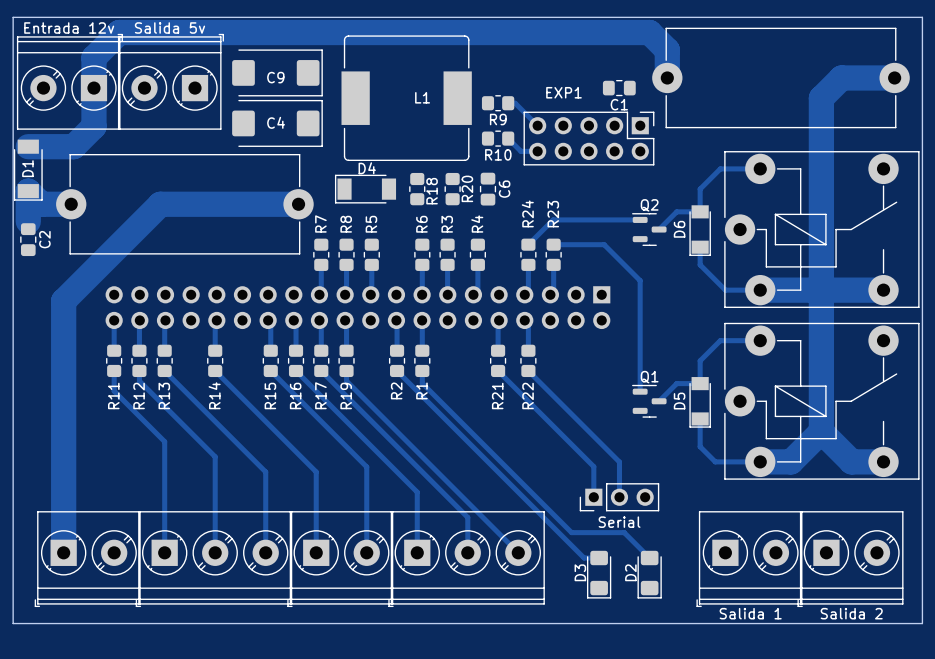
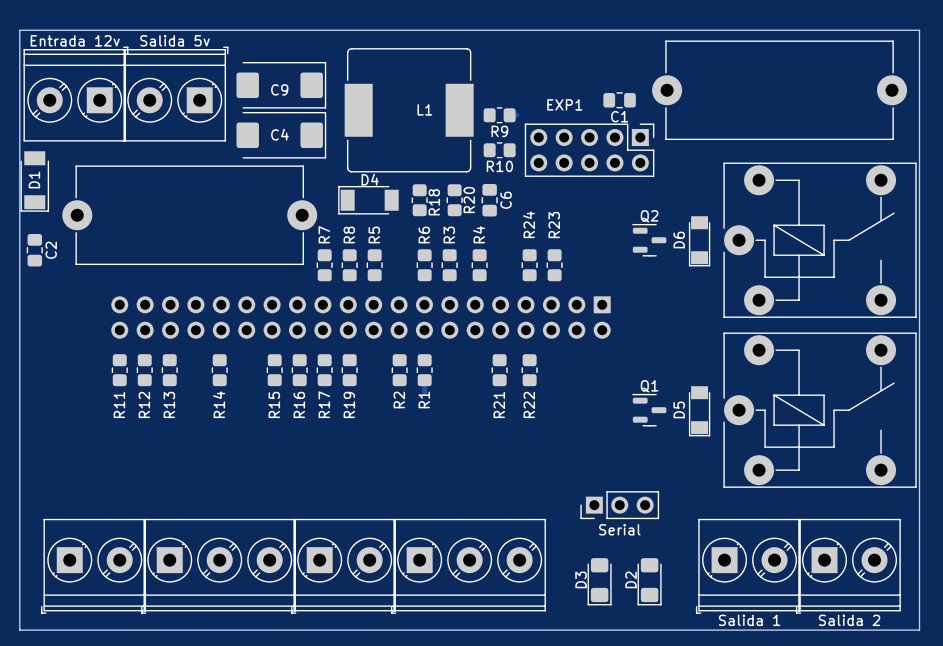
track: (667, 77) (667, 50) (649, 32) (119, 32) (93, 57) (93, 126) (73, 146) (28, 146) -> none
track: (894, 77) (841, 77) (821, 98) (821, 431) -> none
track: (515, 103) (537, 125) -> none
track: (508, 138) (520, 151) (537, 151) -> none
track: (760, 168) (720, 168) (700, 189) (700, 211) (676, 211) (659, 229) -> none
track: (71, 204) (41, 204) (28, 191) (28, 221) -> none
track: (298, 204) (160, 204) (63, 301) (63, 552) -> none
track: (640, 219) (553, 219) (528, 244) -> none
track: (553, 244) (604, 244) (640, 280) (640, 391) -> none
track: (700, 247) (700, 264) (725, 290) (816, 290) (821, 285) (826, 290) (883, 290) -> none
track: (321, 264) (321, 292) -> none
track: (346, 264) (346, 293) -> none
track: (371, 264) (371, 293) -> none
track: (422, 264) (422, 294) -> none
track: (447, 264) (447, 294) -> none
track: (477, 264) (477, 290) -> none
track: (528, 264) (528, 291) -> none
track: (553, 264) (553, 291) -> none
track: (114, 320) (114, 350) -> none
track: (139, 320) (139, 350) -> none
track: (422, 320) (422, 350) -> none
track: (164, 321) (164, 350) -> none
track: (346, 321) (346, 350) -> none
track: (397, 321) (397, 350) -> none
track: (498, 321) (498, 350) -> none
track: (215, 322) (215, 350) -> none
track: (296, 322) (296, 350) -> none
track: (321, 322) (321, 350) -> none
track: (270, 323) (270, 350) -> none
track: (528, 324) (528, 350) -> none
track: (760, 340) (720, 340) (700, 360) (700, 383) (676, 383) (659, 401) -> none
track: (114, 370) (114, 391) (164, 441) (164, 552) -> none
track: (139, 370) (139, 381) (215, 456) (215, 552) -> none
track: (164, 370) (265, 472) (265, 552) -> none
track: (215, 370) (316, 472) (316, 552) -> none
track: (270, 370) (366, 466) (366, 552) -> none
track: (296, 370) (417, 492) (417, 552) -> none
track: (321, 370) (467, 517) (467, 552) -> none
track: (346, 370) (346, 381) (518, 552) -> none
track: (397, 370) (584, 558) (599, 558) -> none
track: (498, 370) (593, 466) (593, 497) -> none
track: (528, 370) (619, 462) (619, 497) -> none
track: (422, 383) (571, 532) (624, 532) (649, 558) -> none
track: (700, 418) (700, 446) (715, 461) (791, 461) (821, 431) -> none
track: (821, 431) (851, 461) (883, 461) -> none

